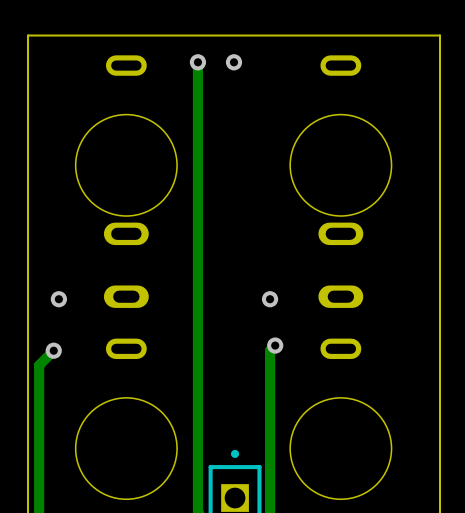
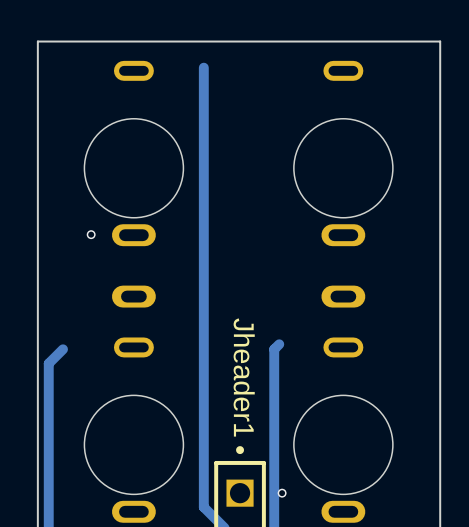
via: (197, 62) -> none
via: (234, 62) -> none
via: none -> (91, 234)
via: (58, 299) -> none
via: (270, 299) -> none
via: (275, 345) -> none
via: (53, 350) -> none
Jheader1 name: none -> Jheader1 (244, 377)
via: none -> (282, 493)

